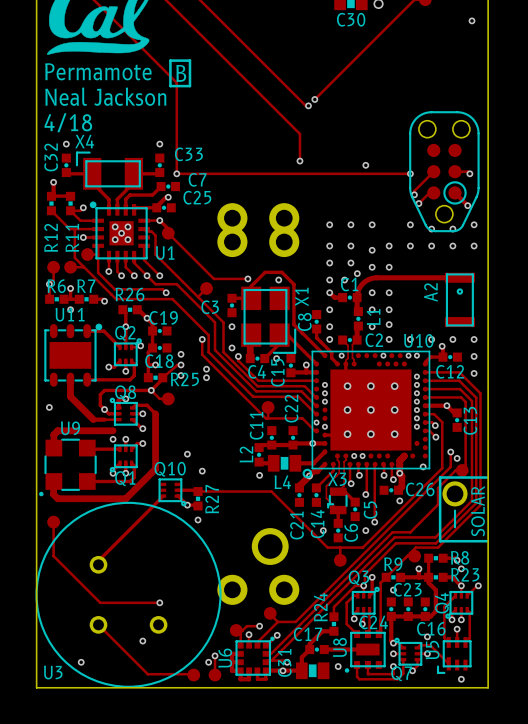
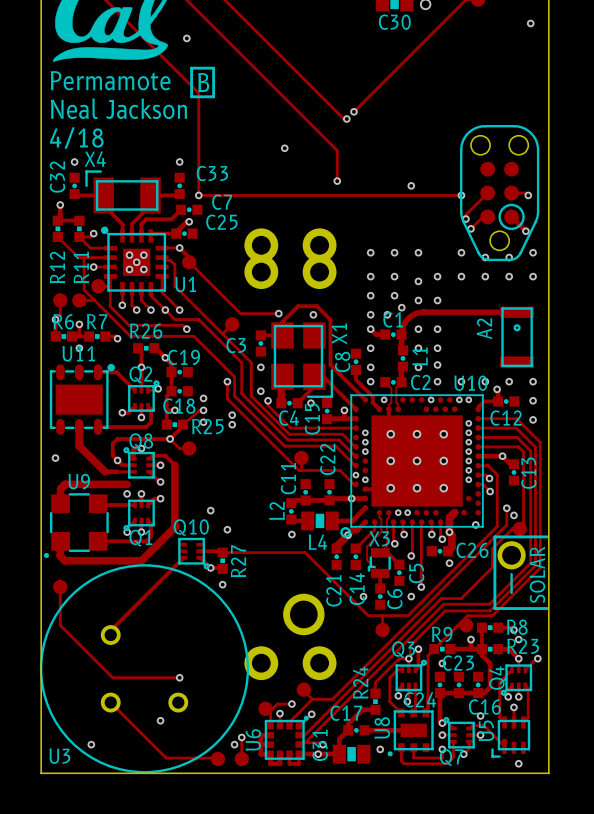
via: none -> (186, 38)
via: none -> (284, 148)

